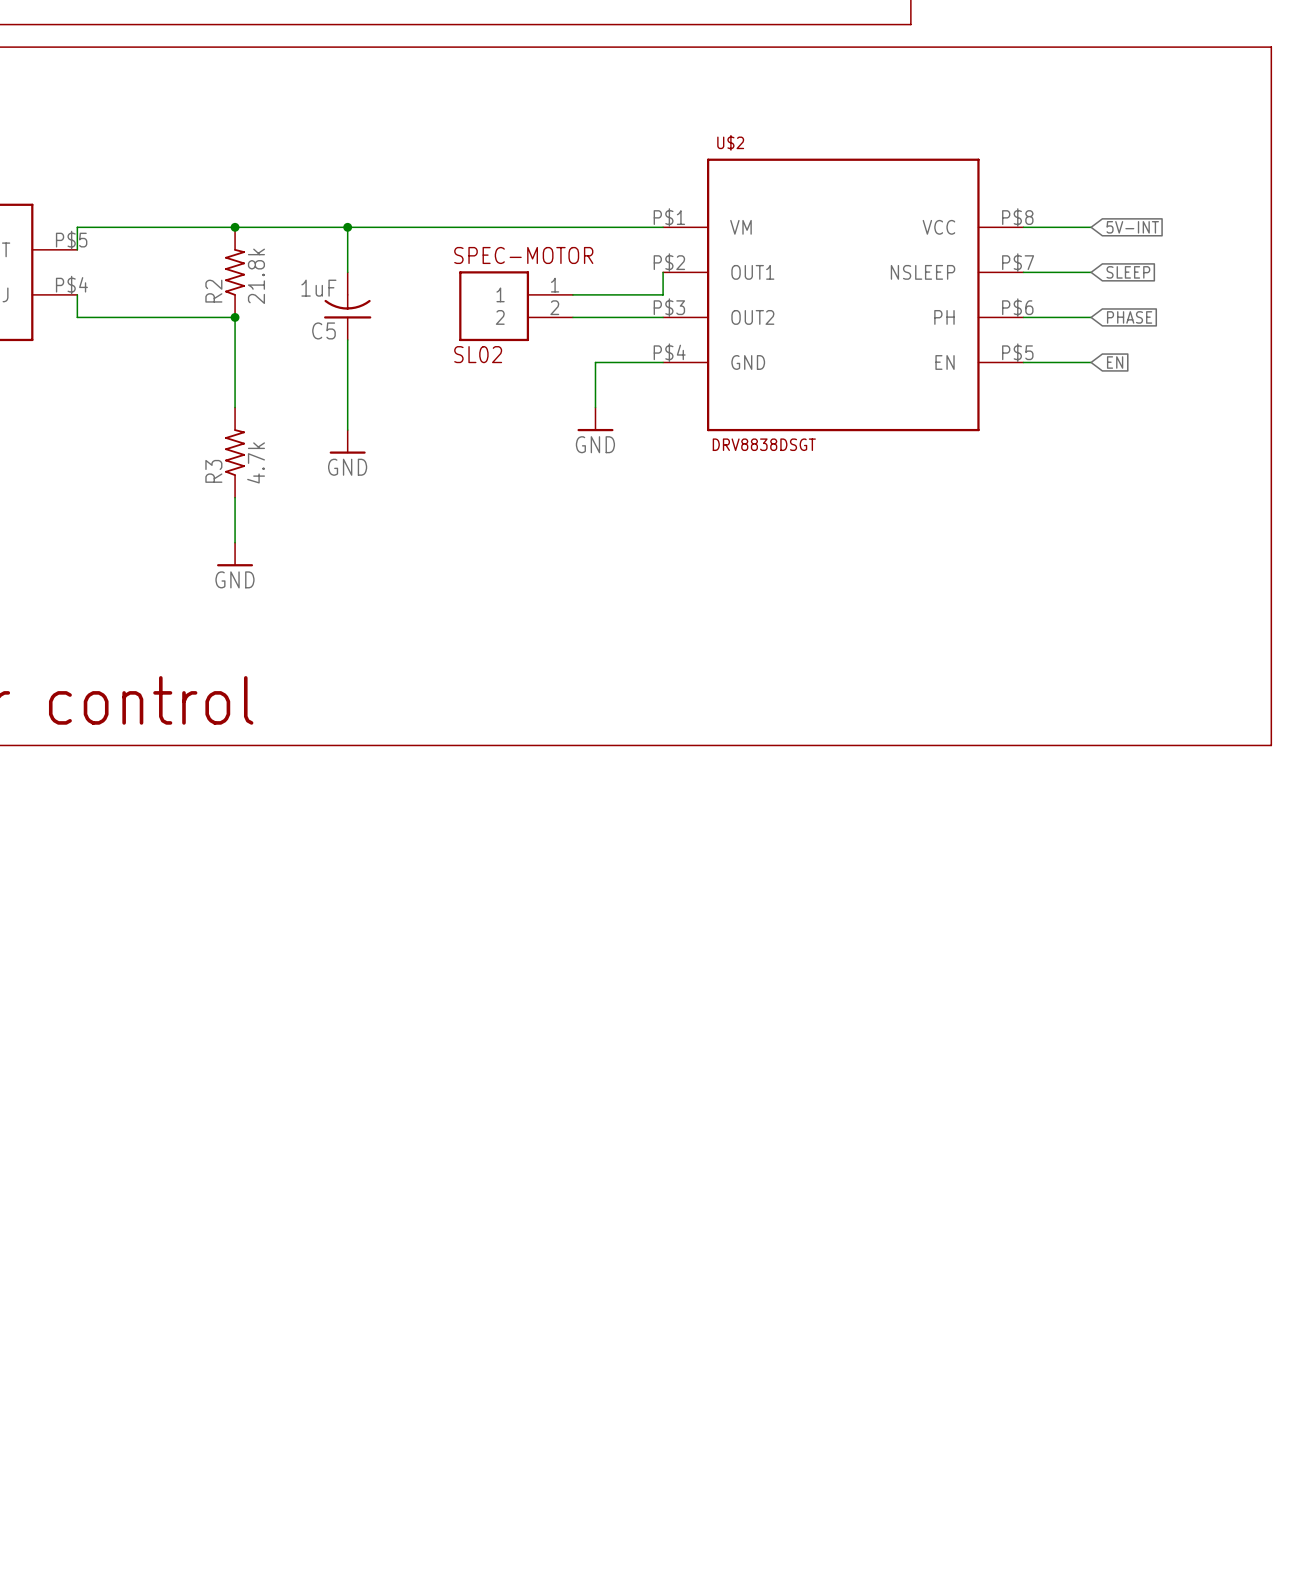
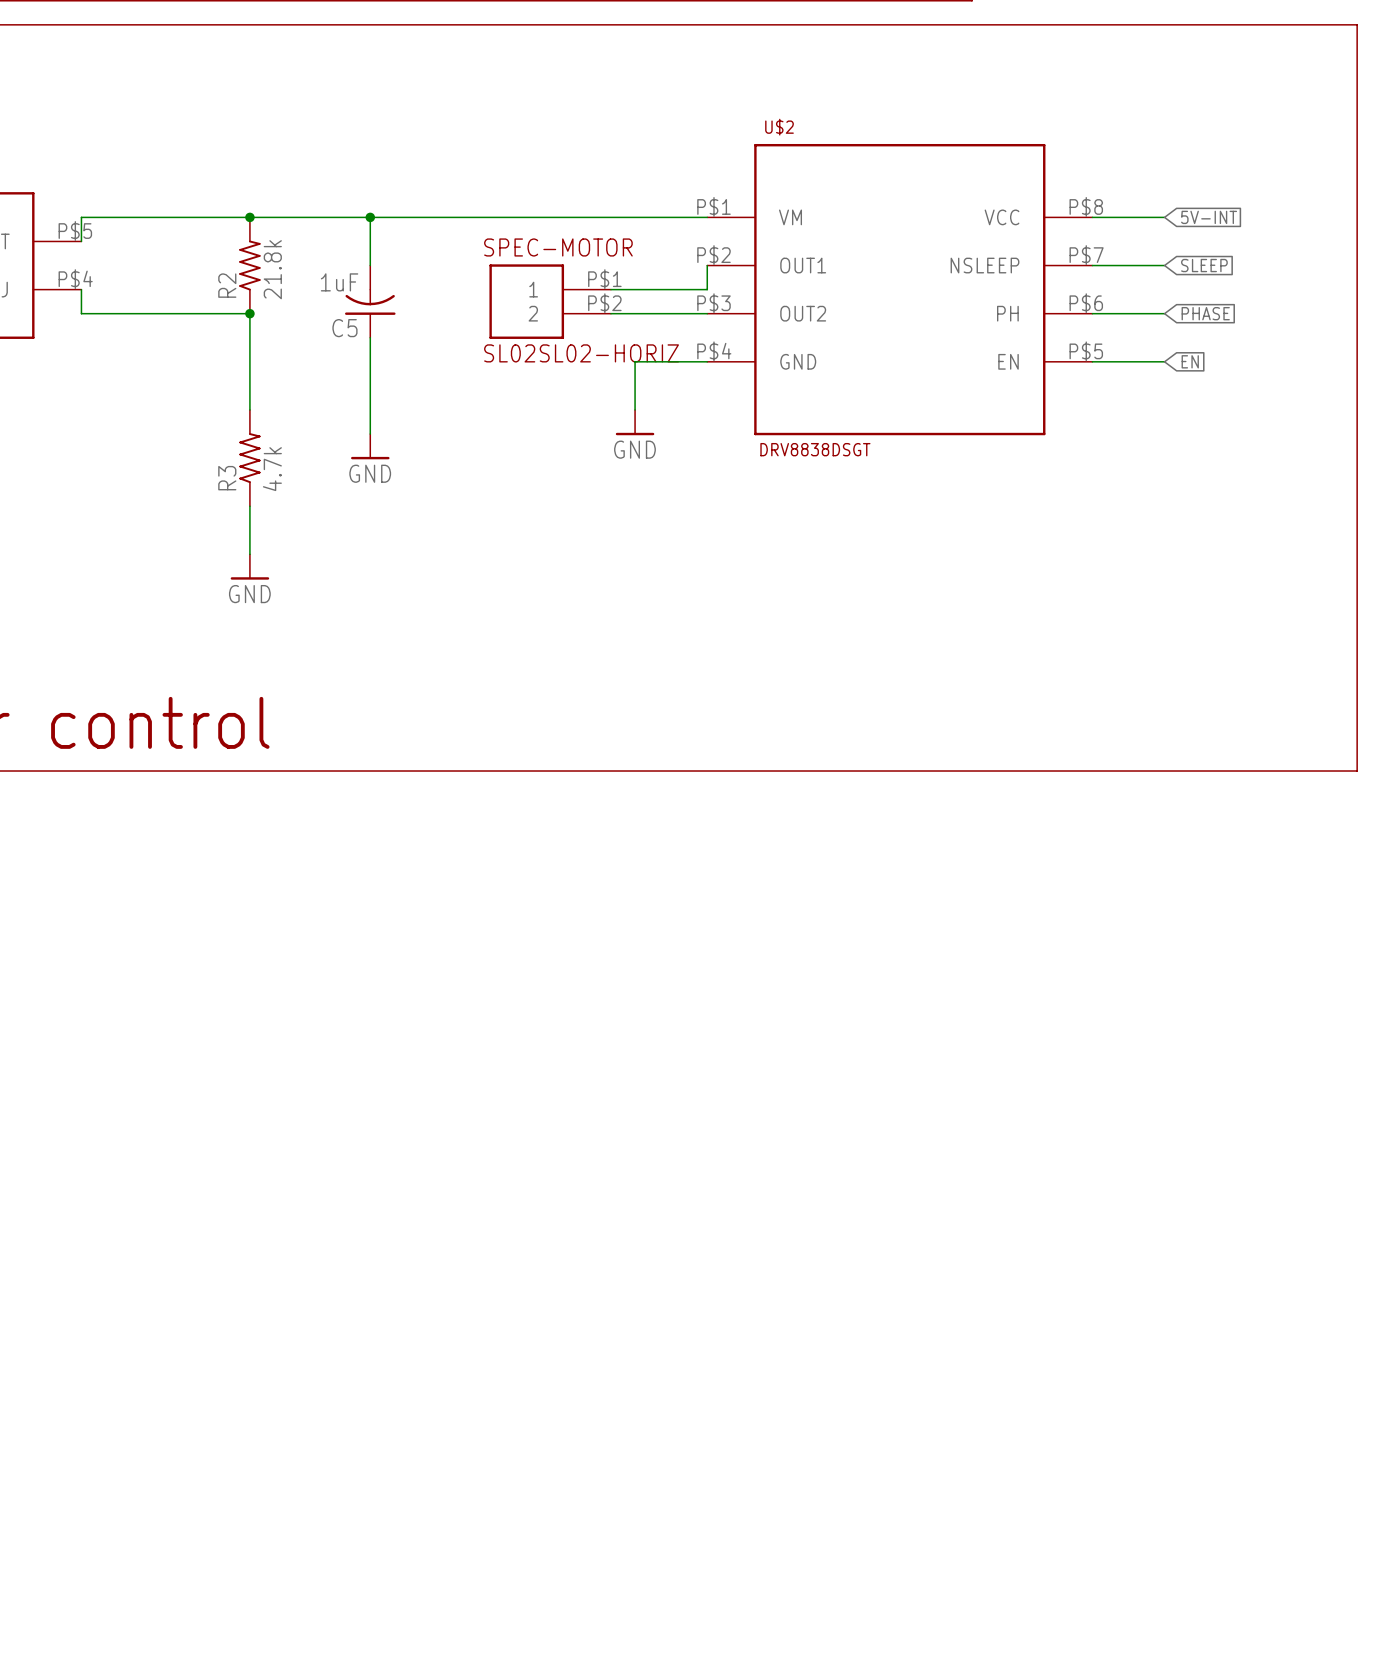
SPEC-MOTOR pin number: 1 (555, 285) -> P$1 (604, 279)
SPEC-MOTOR pin number: 2 (554, 307) -> P$2 (604, 303)
SPEC-MOTOR value: SL02 (478, 354) -> SL02SL02-HORIZ (581, 353)

